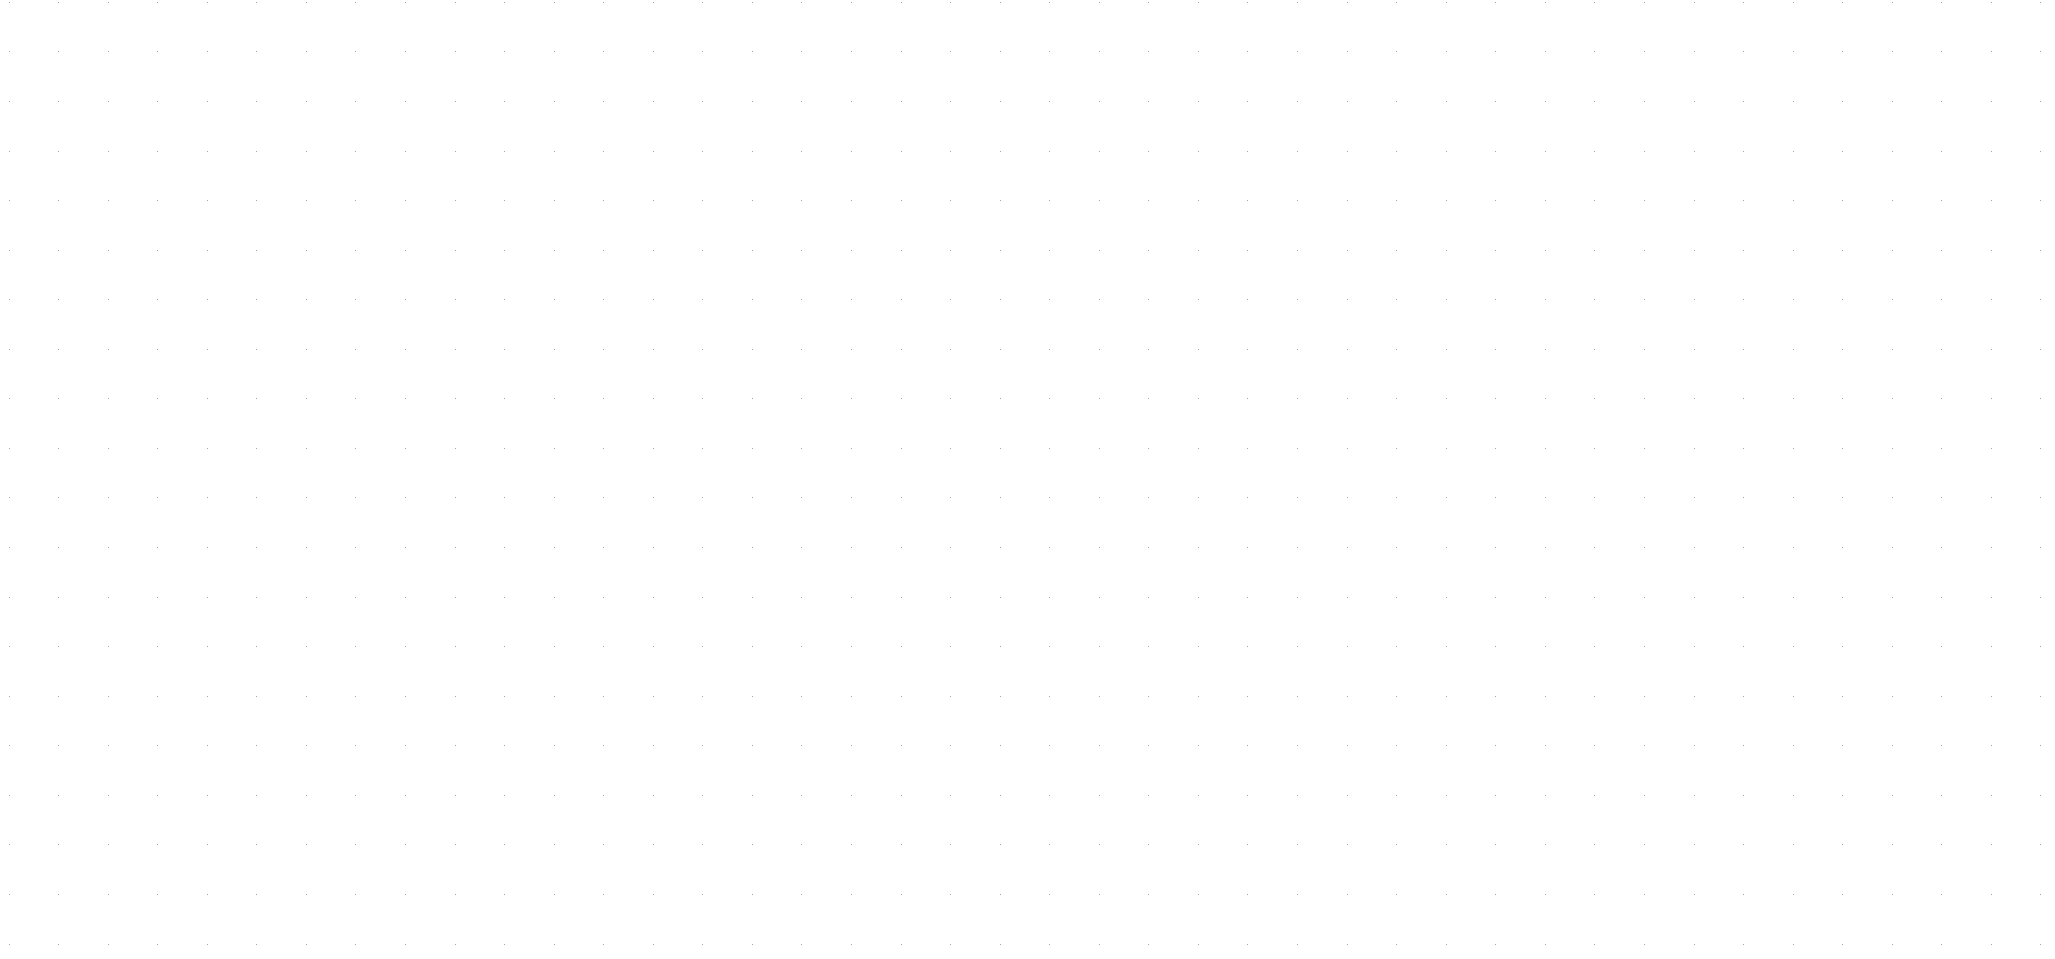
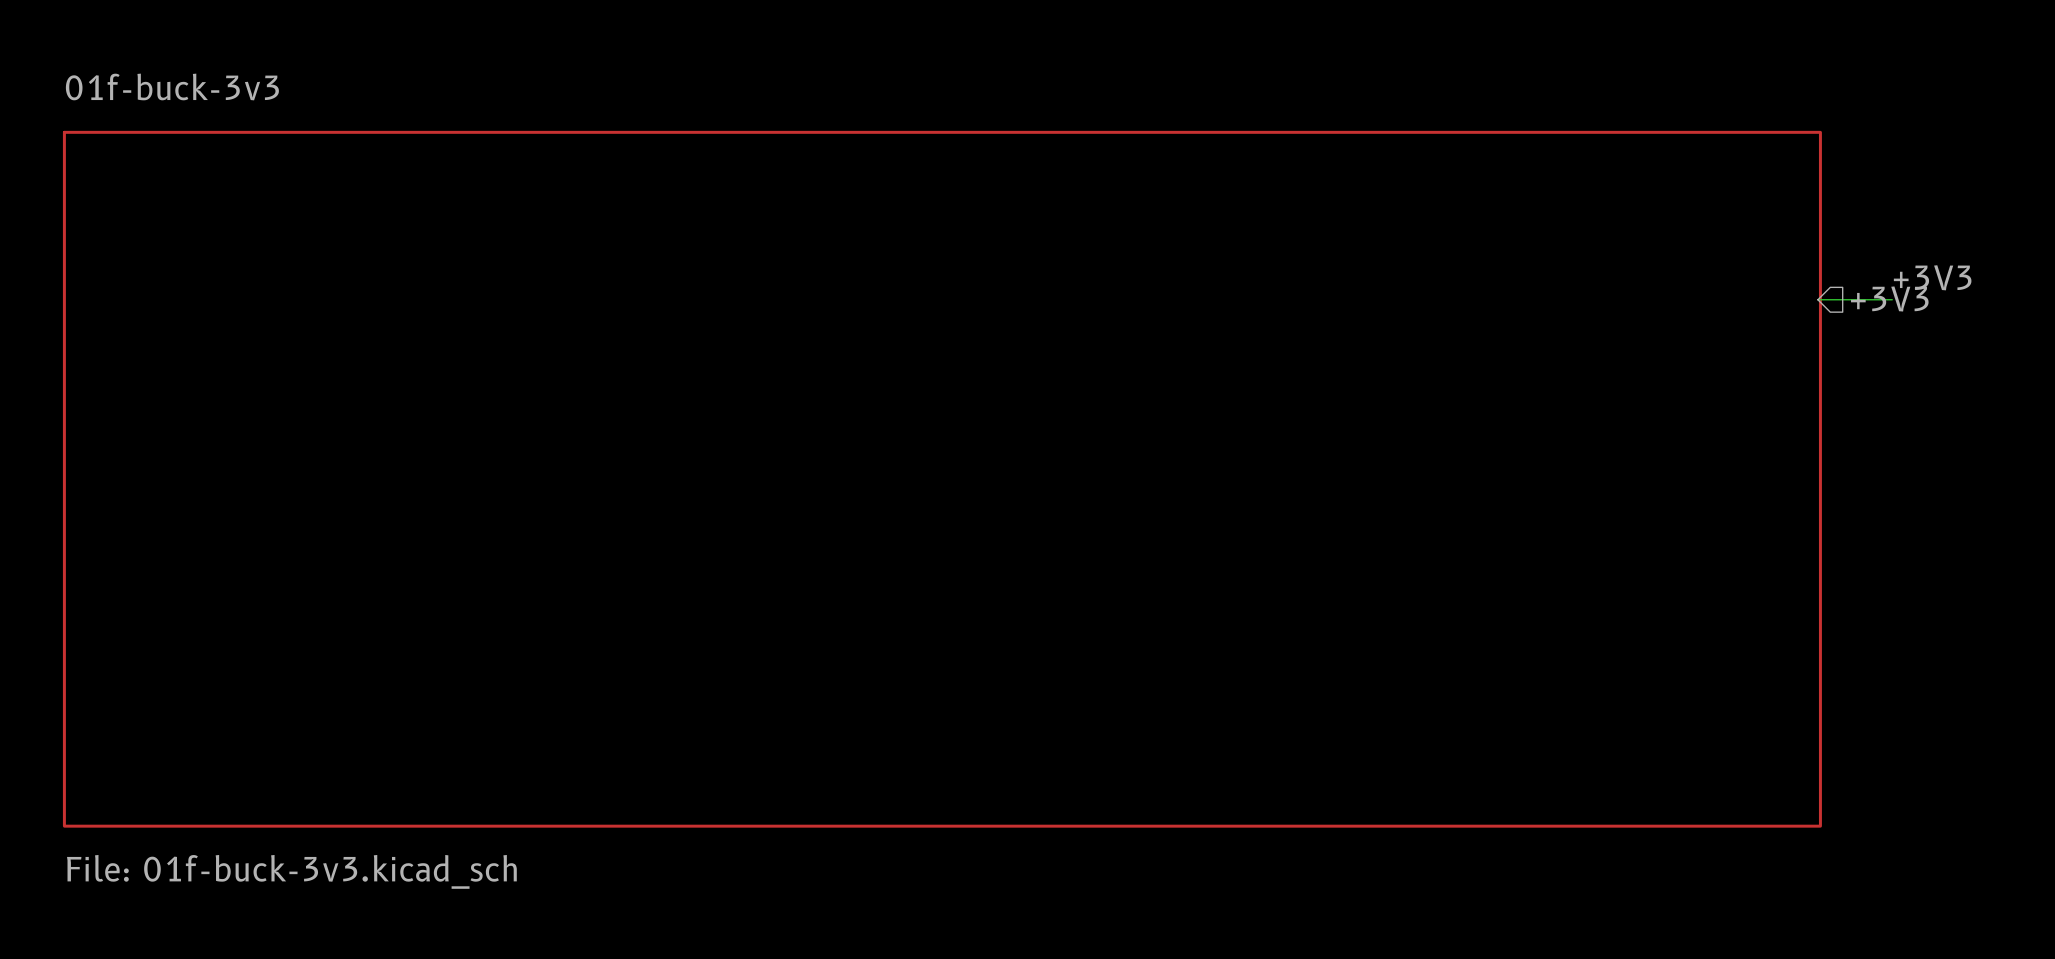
label: none -> +3V3 (1932, 277)
sheet pin: none -> +3V3 (1889, 298)
wire: none -> (1817, 299) (1892, 299)
sheet 01f-buck-3v3: none -> File: 01f-buck-3v3.kicad_sch (942, 479)

